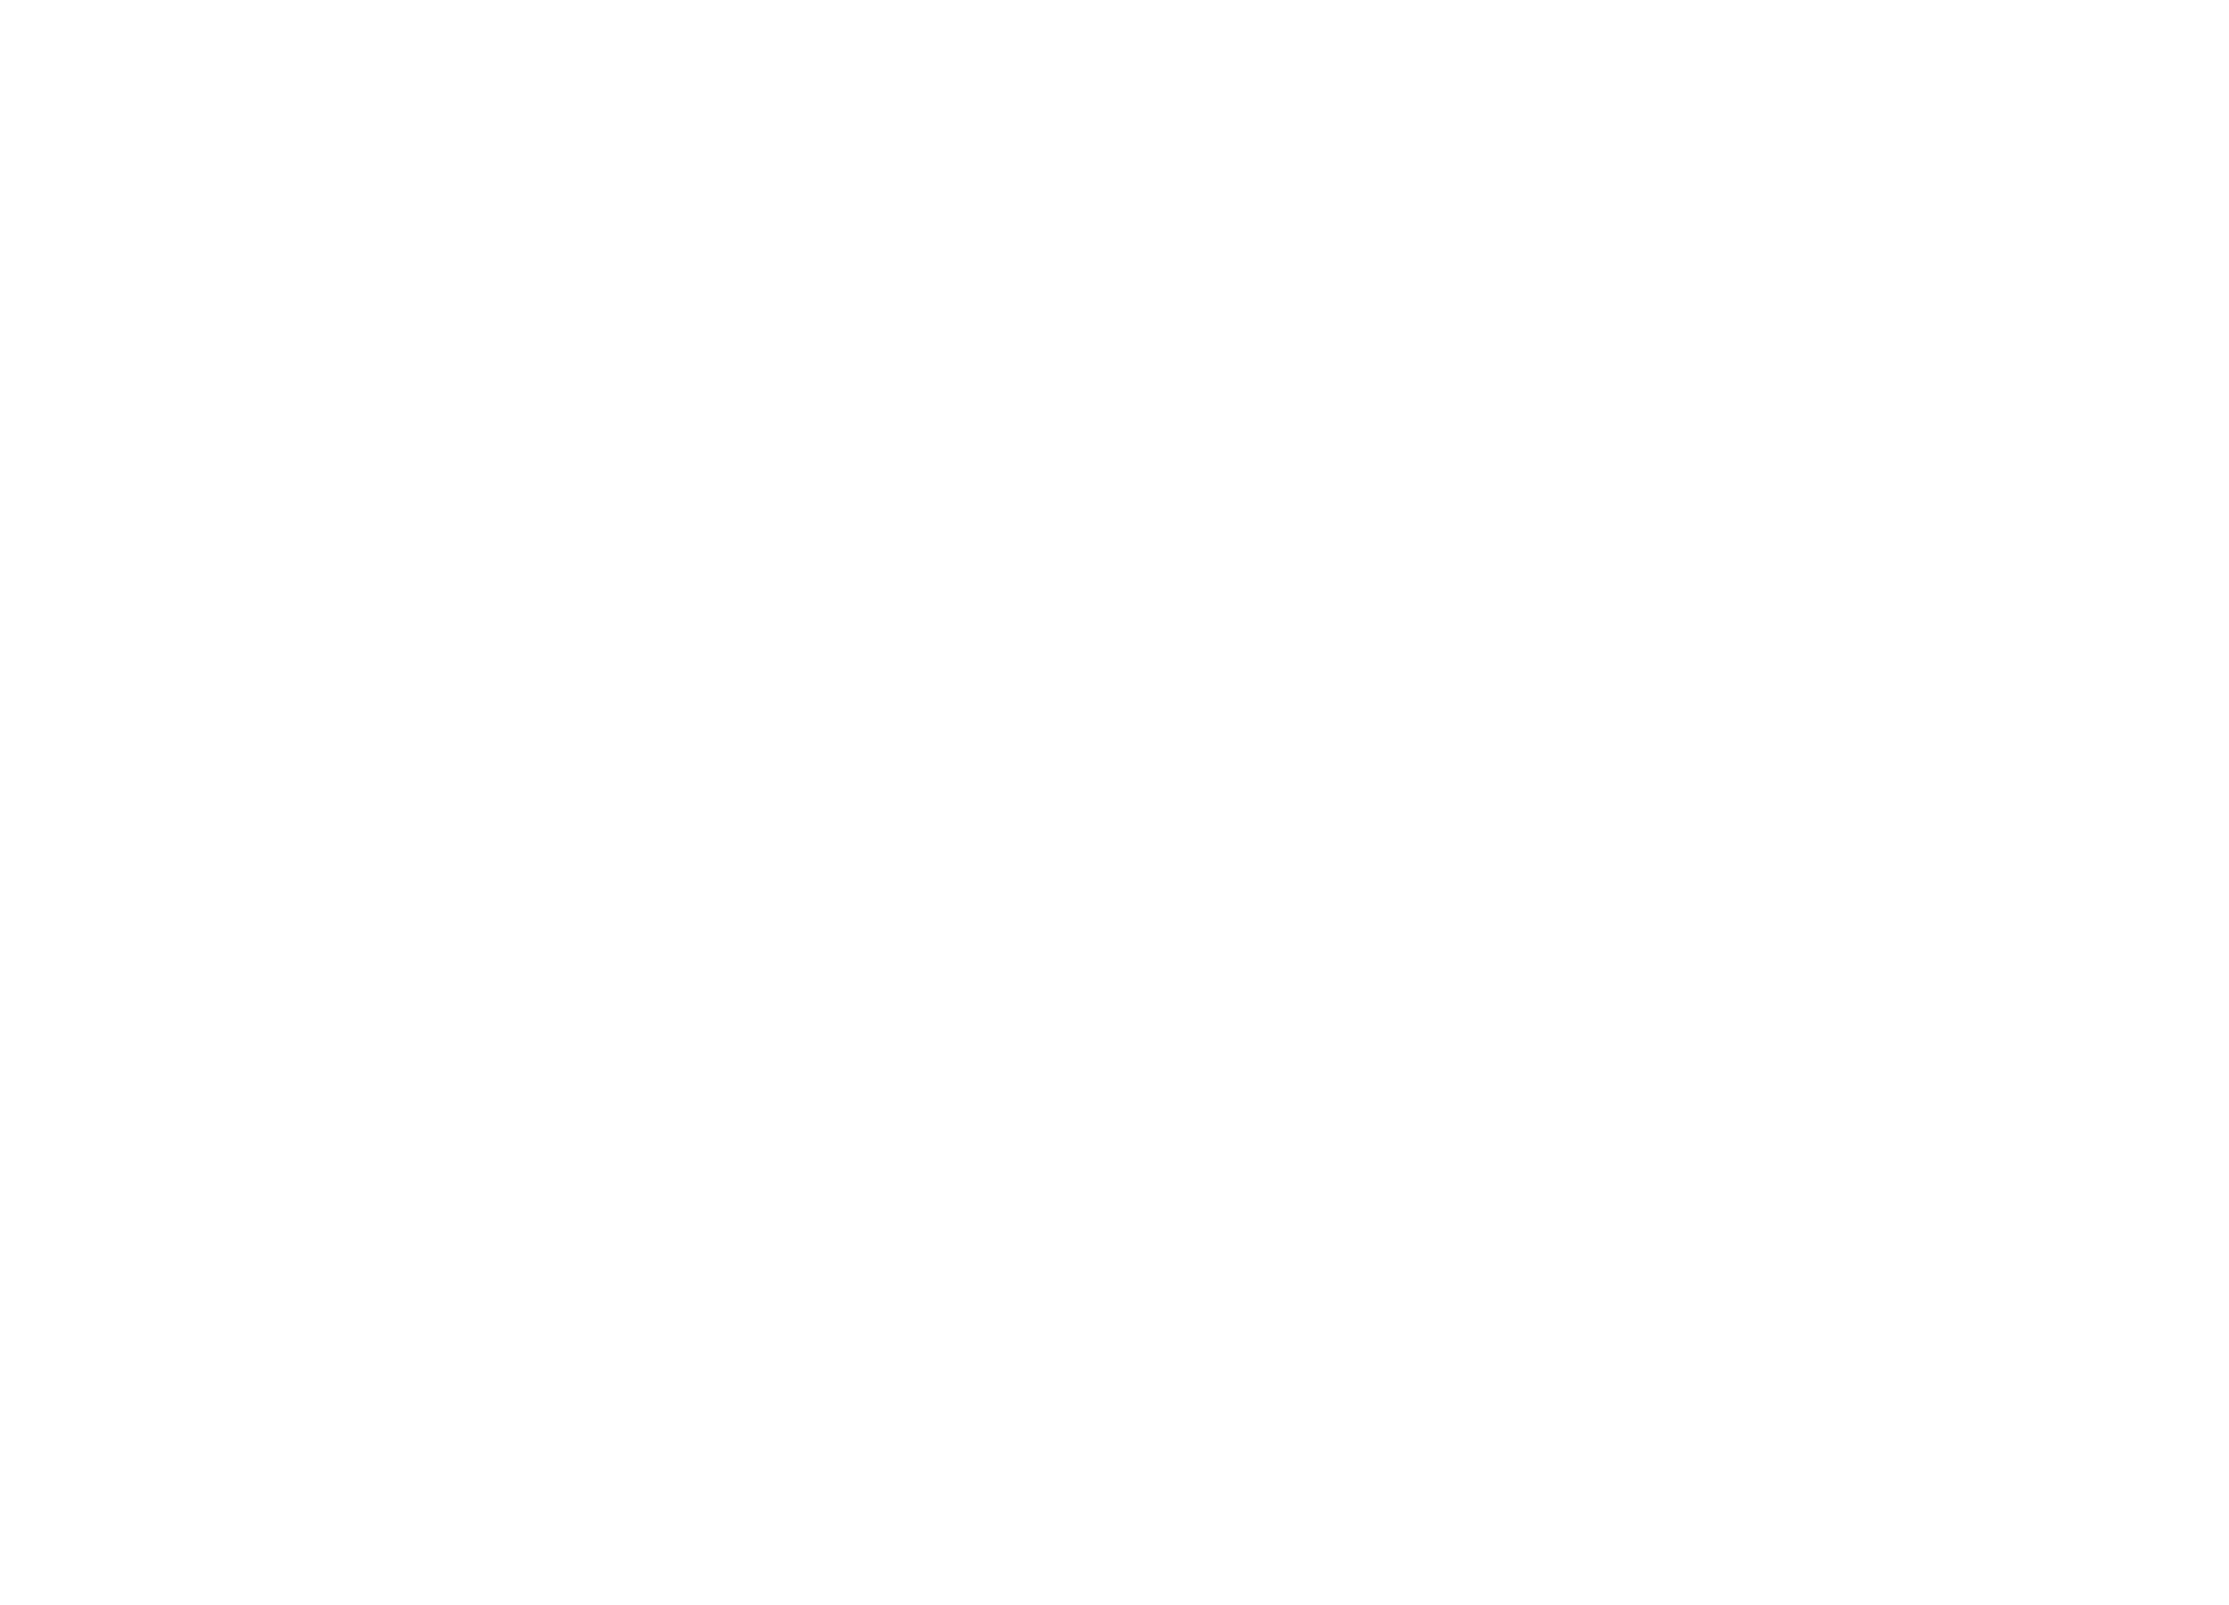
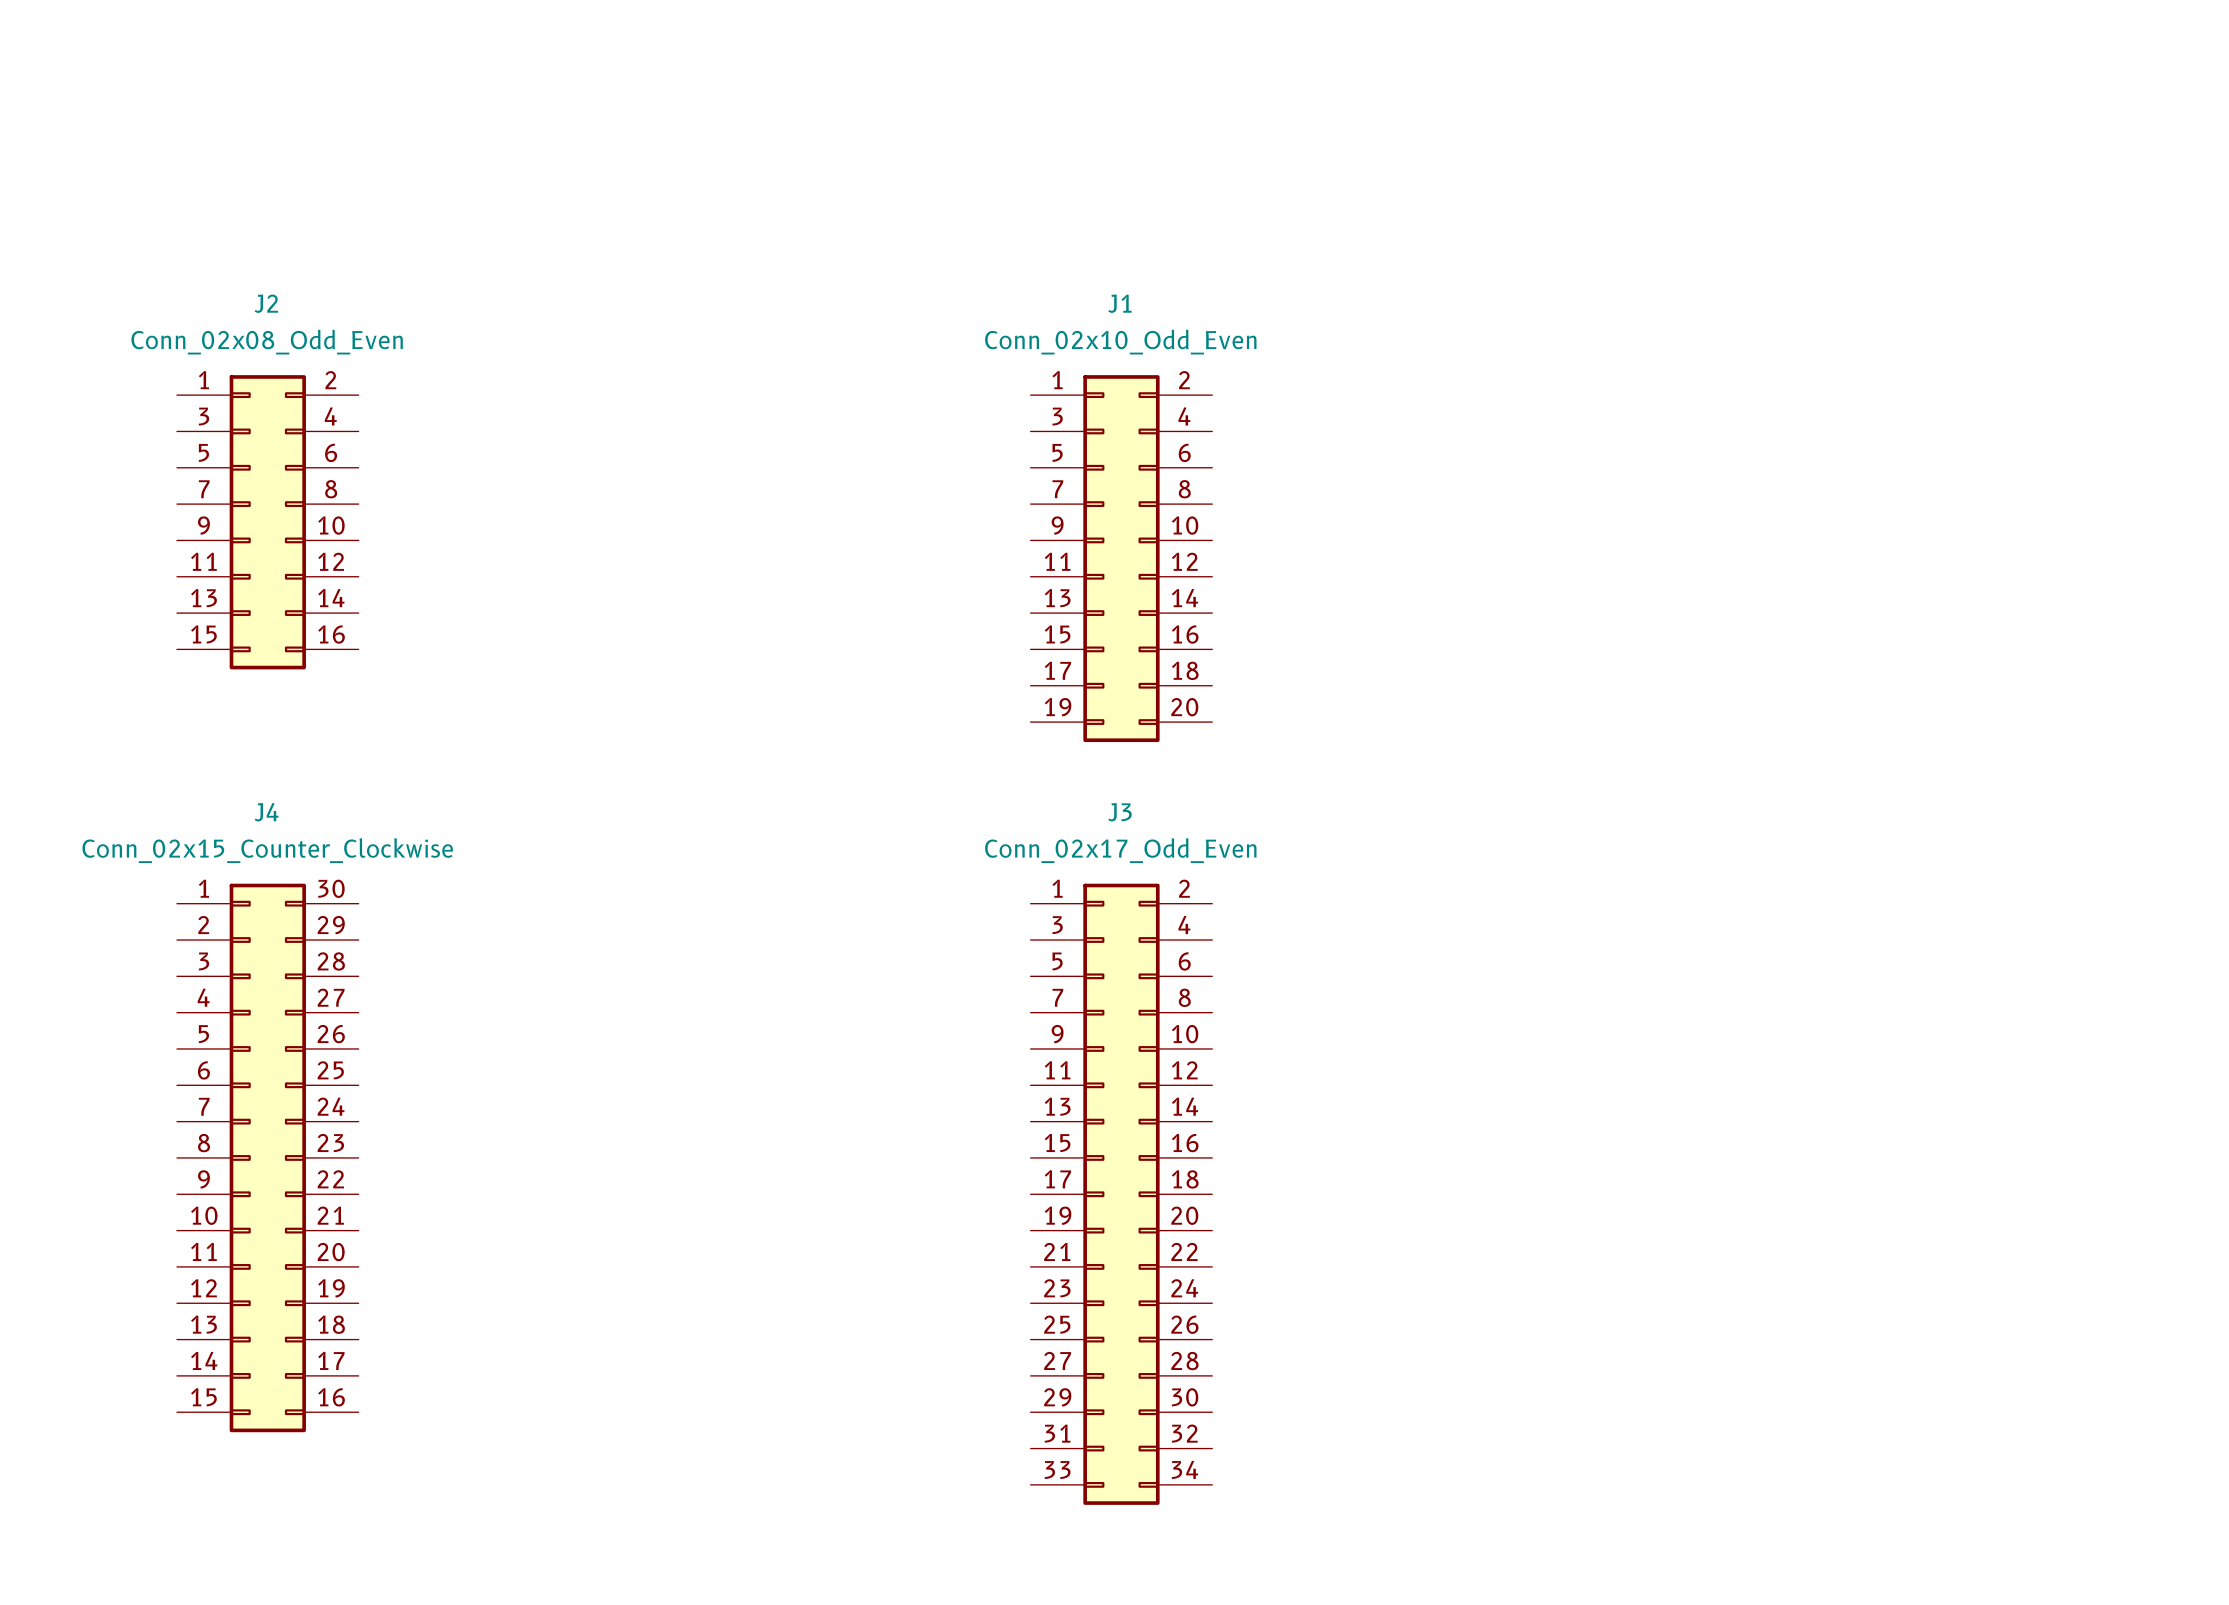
J2: none -> Conn_02x08_Odd_Even (267, 522)
J1: none -> Conn_02x10_Odd_Even (1121, 558)
J4: none -> Conn_02x15_Counter_Clockwise (267, 1157)
J3: none -> Conn_02x17_Odd_Even (1121, 1194)

